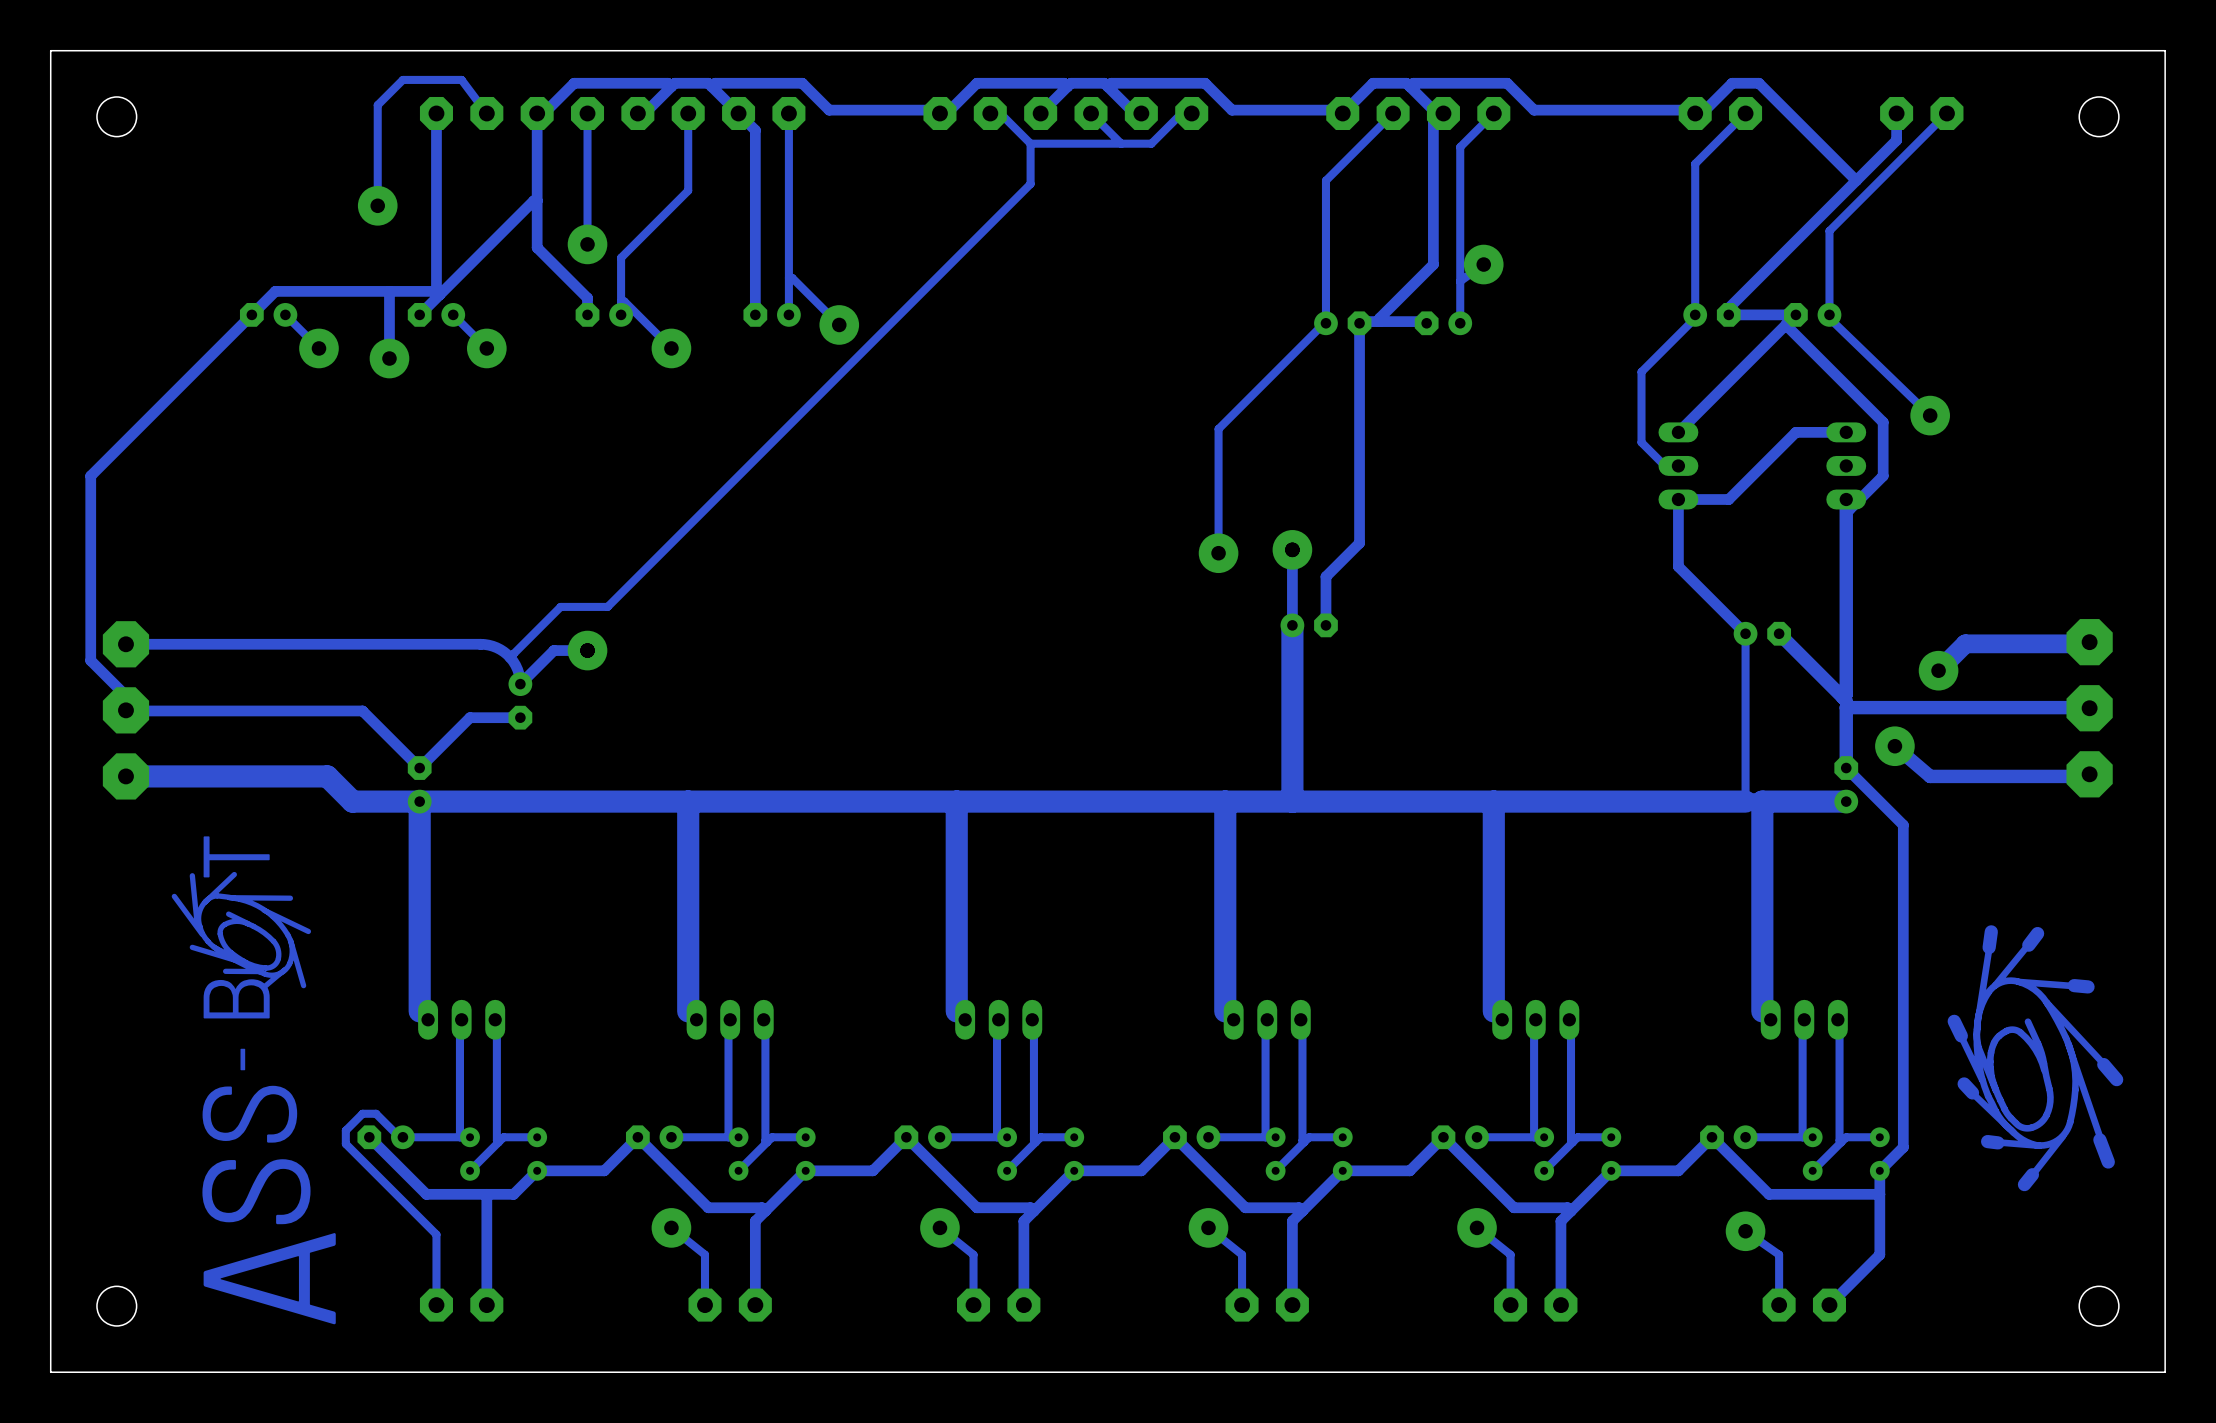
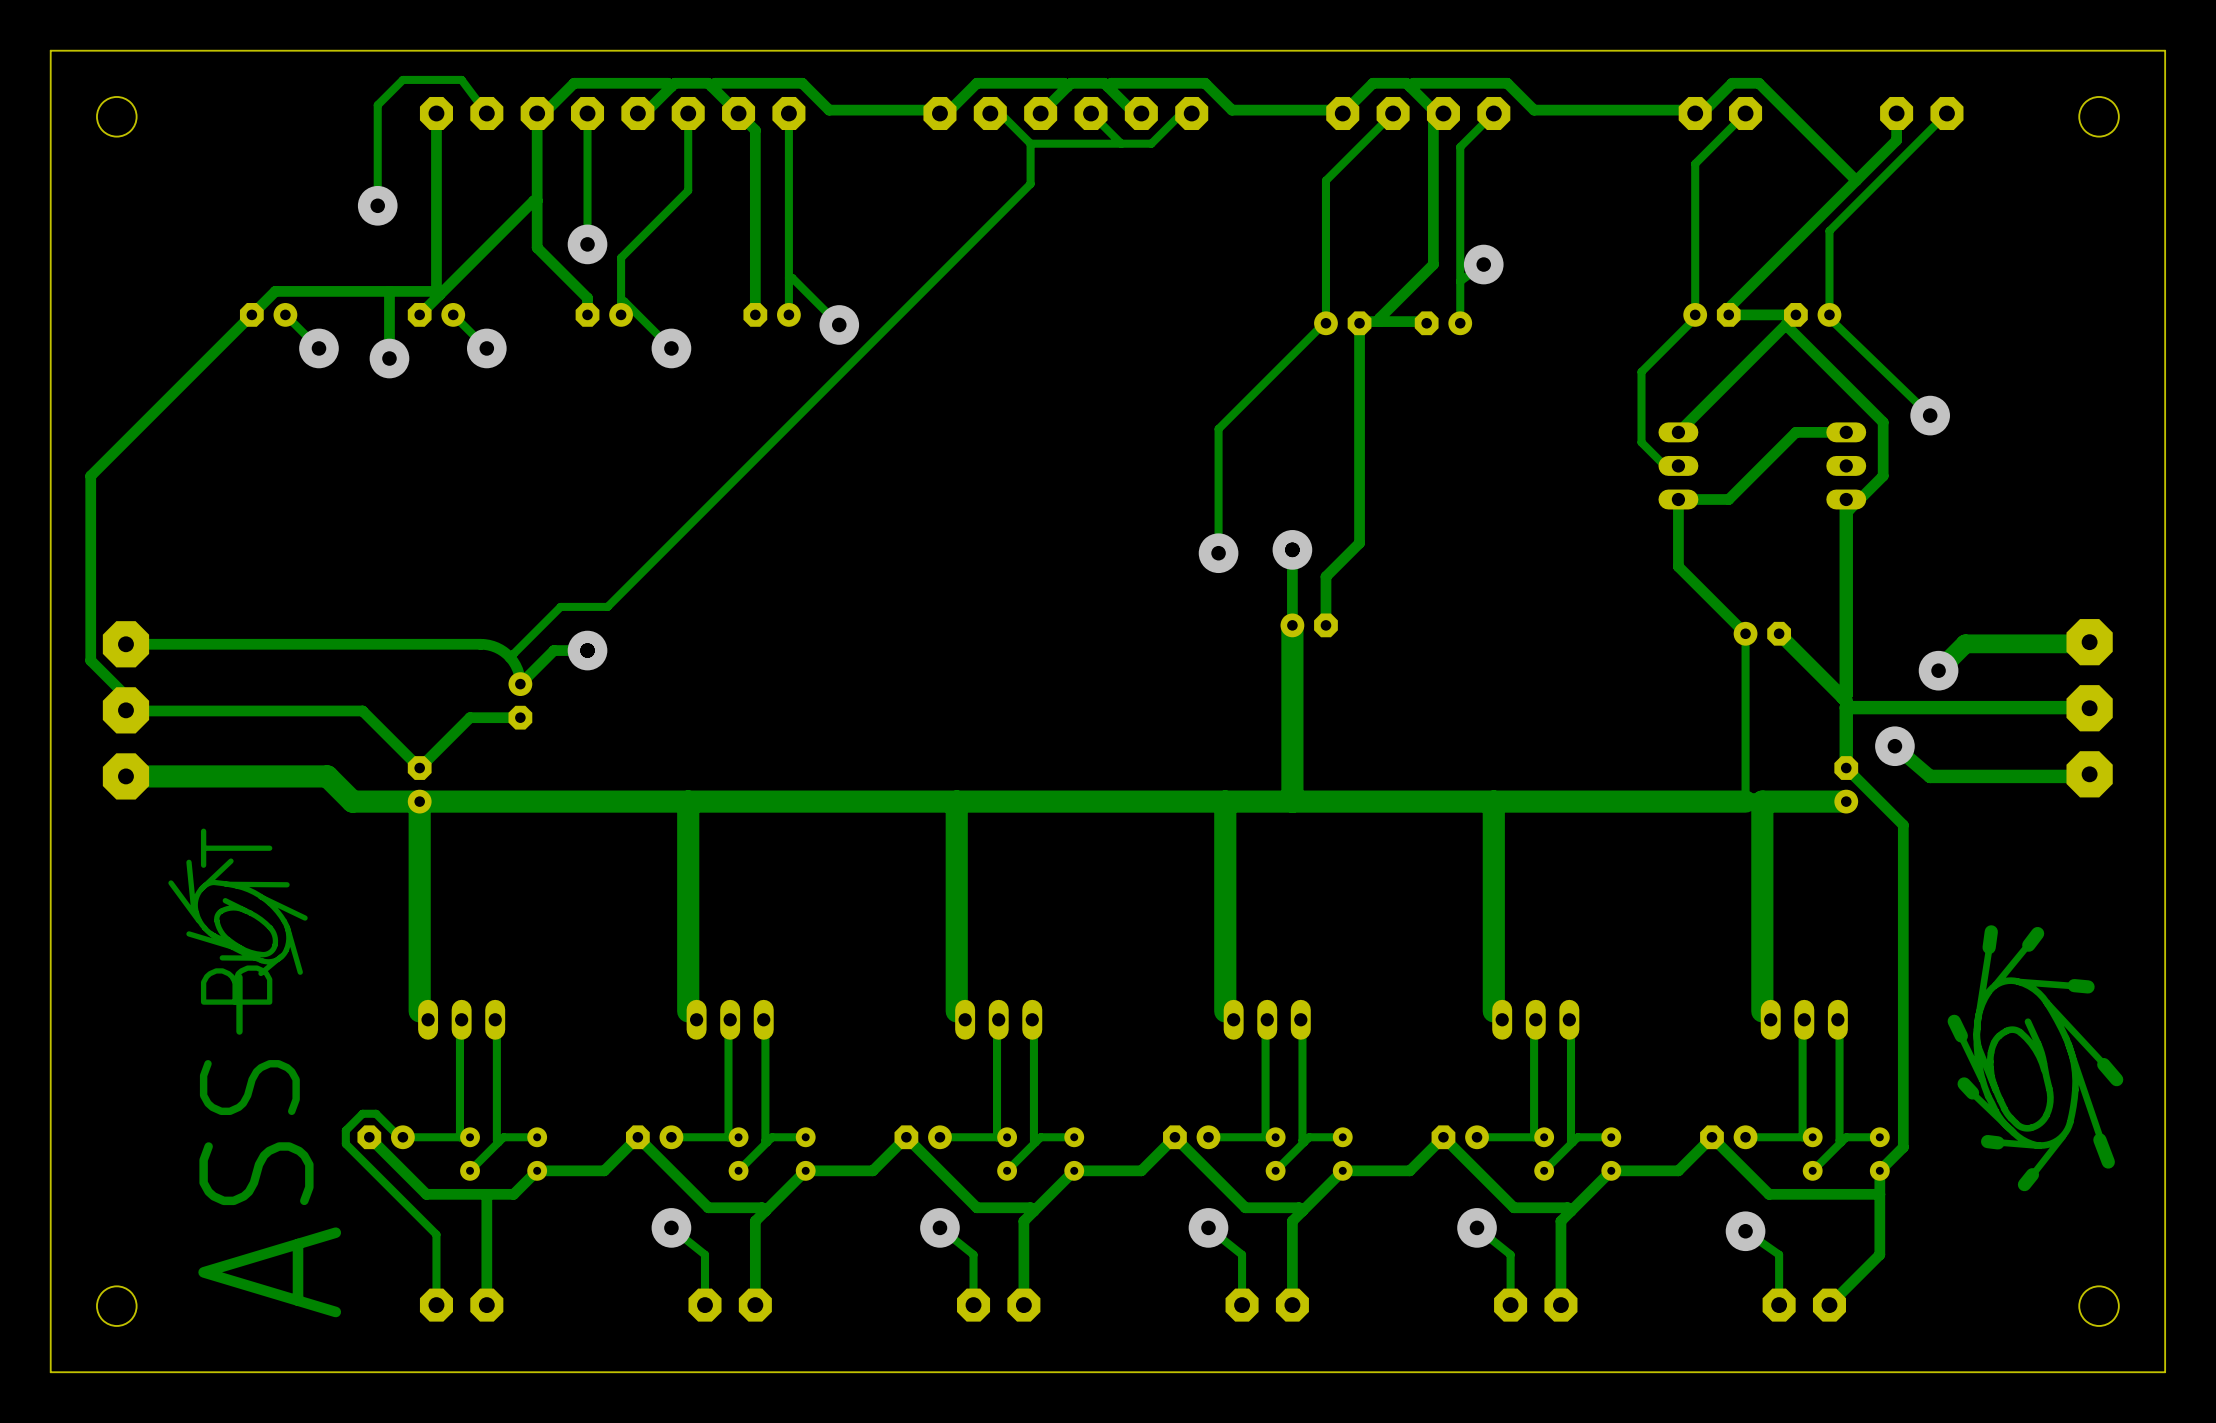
drawing: none -> [168, 858, 308, 977]
drawing: [171, 871, 312, 990] -> none

